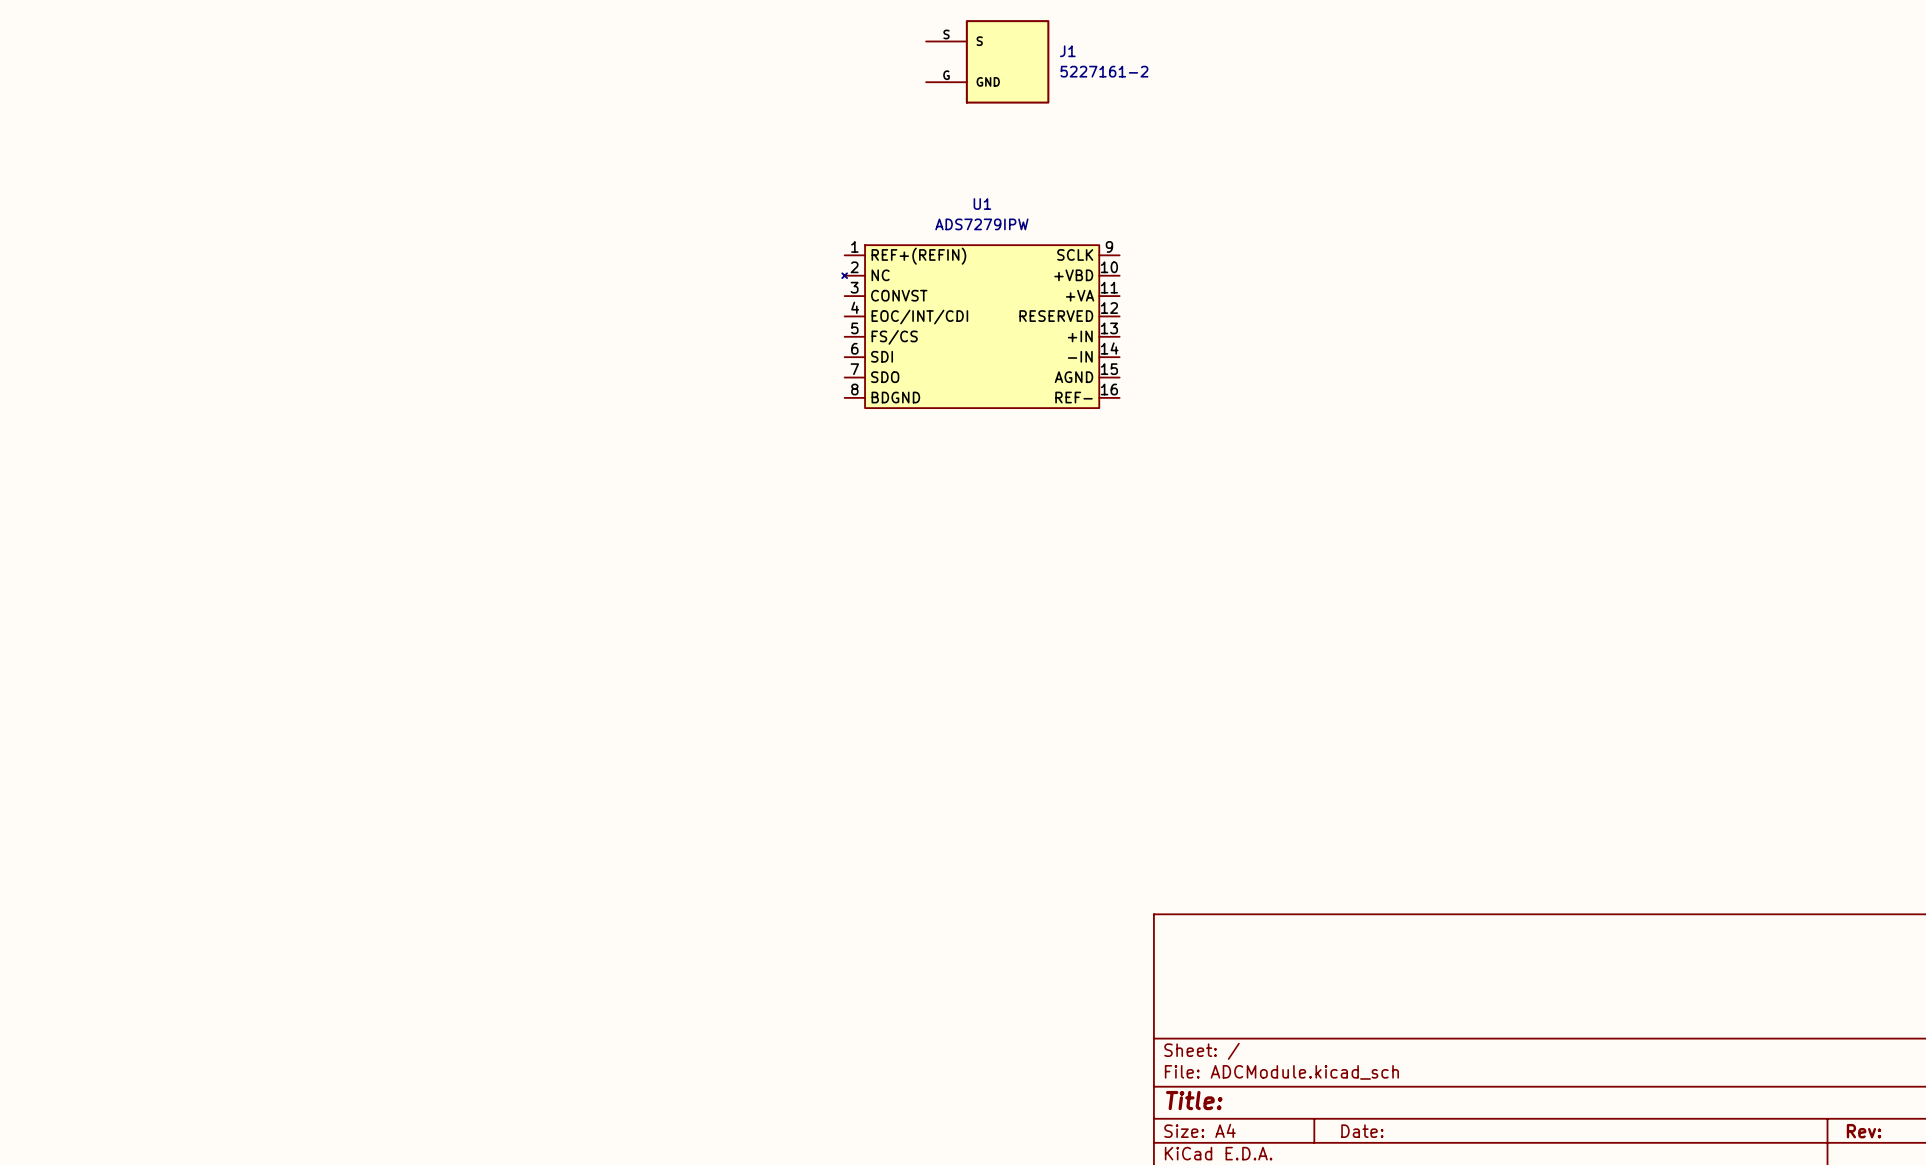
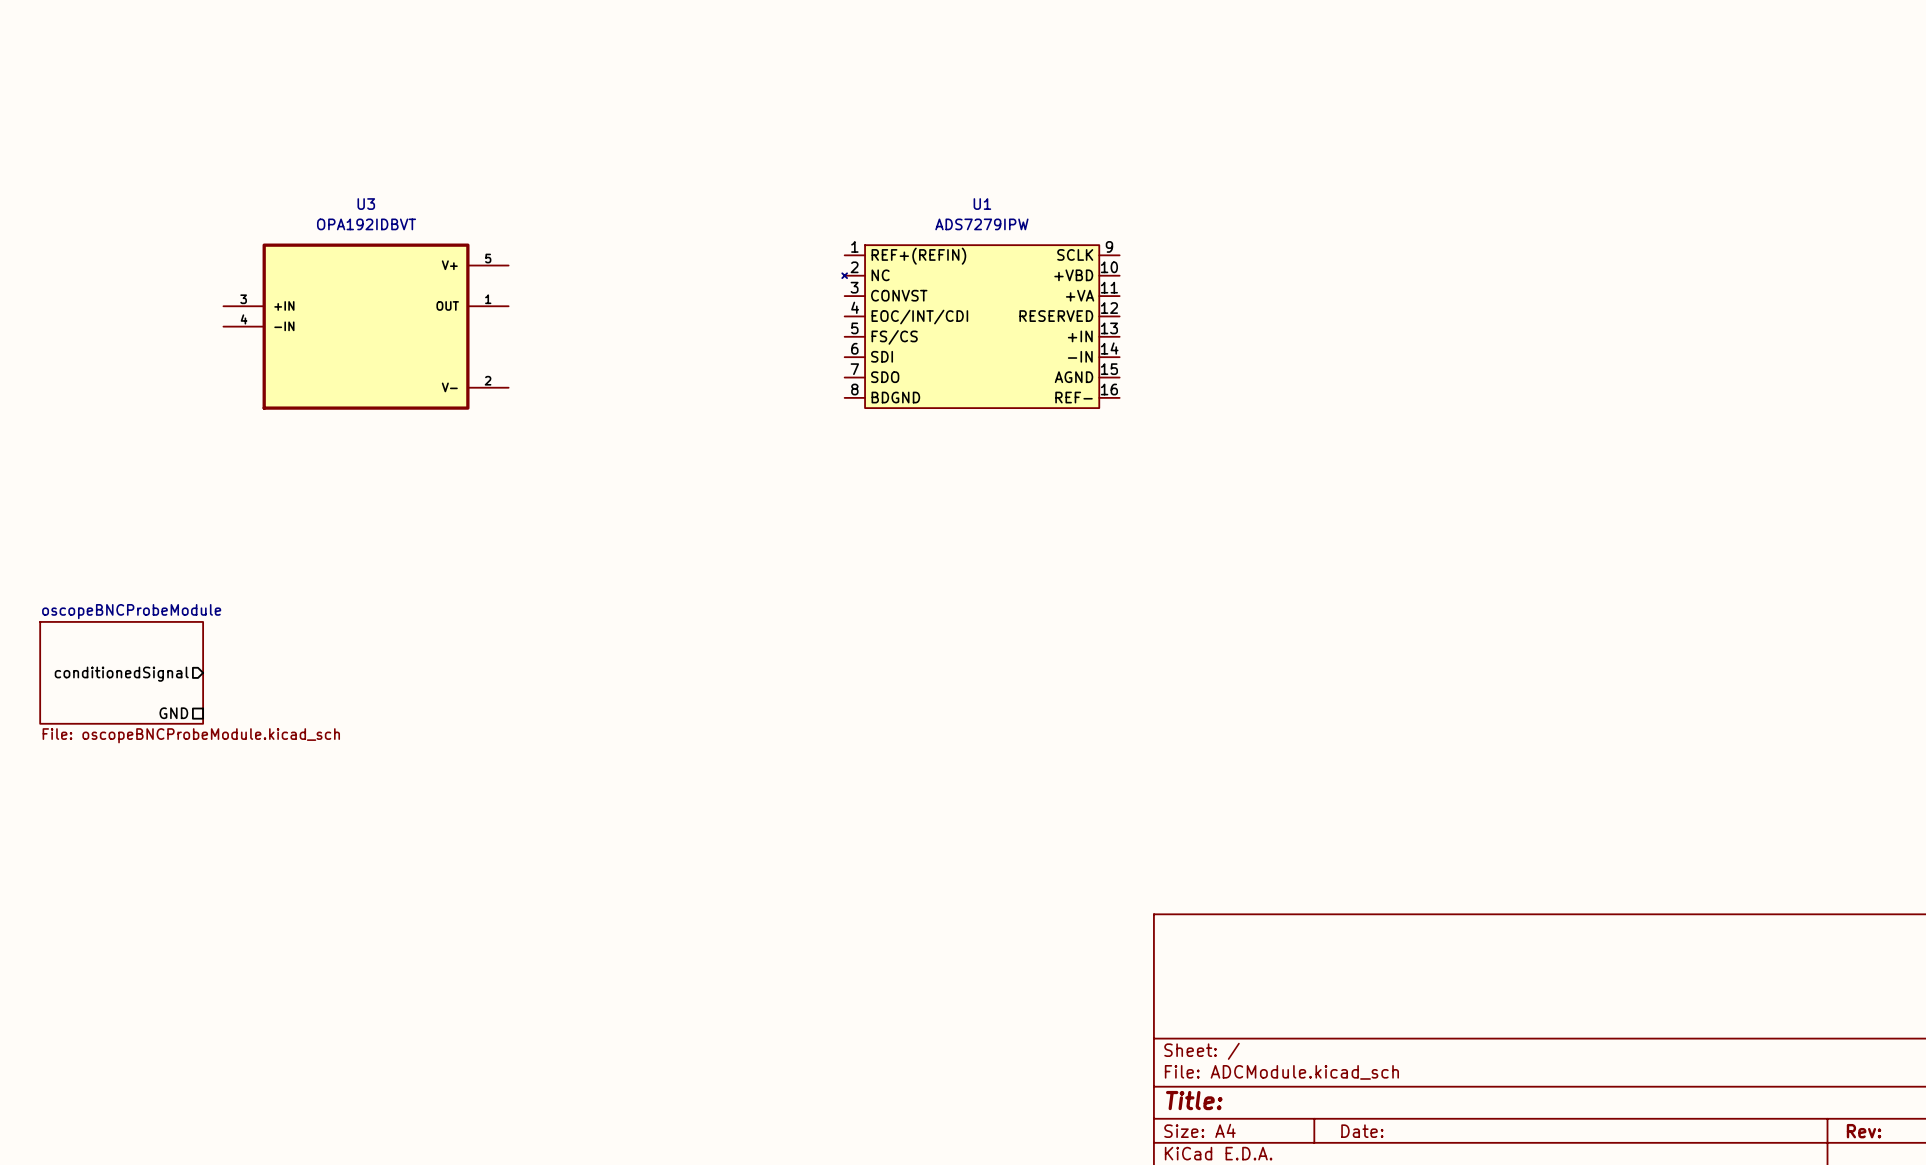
J1: 5227161-2 (987, 61) -> none
U3: none -> OPA192IDBVT (366, 326)
sheet oscopeBNCProbeModule: none -> File: oscopeBNCProbeModule.kicad_sch (121, 672)
sheet pin: none -> conditionedSignal (121, 674)
sheet pin: none -> GND (173, 713)

